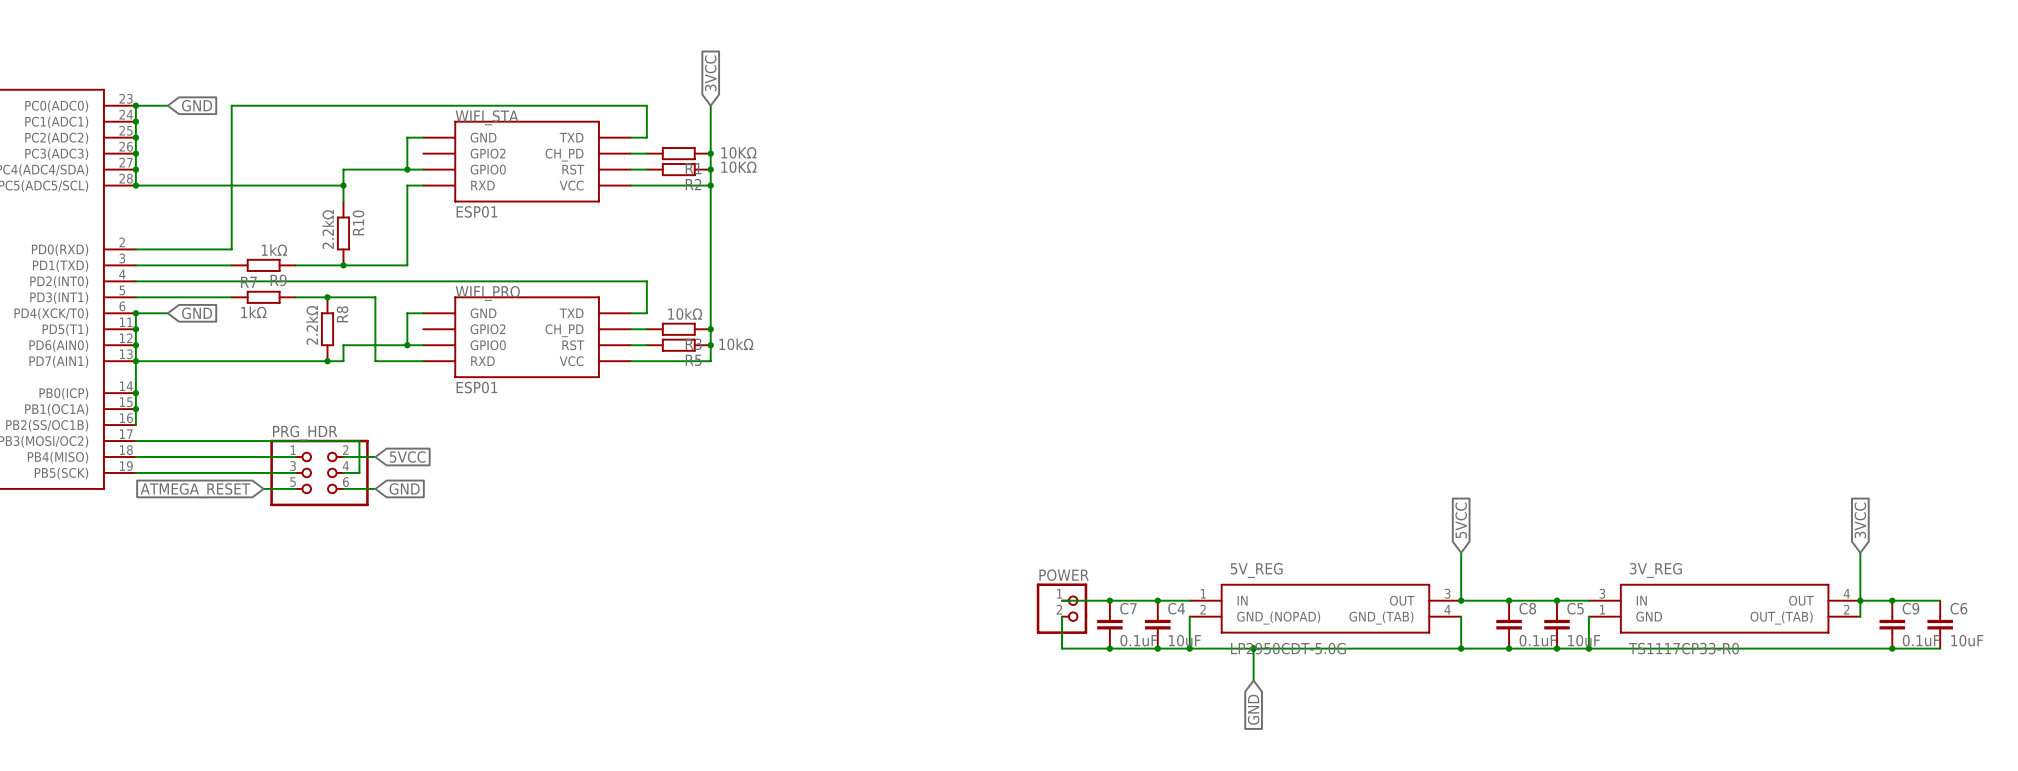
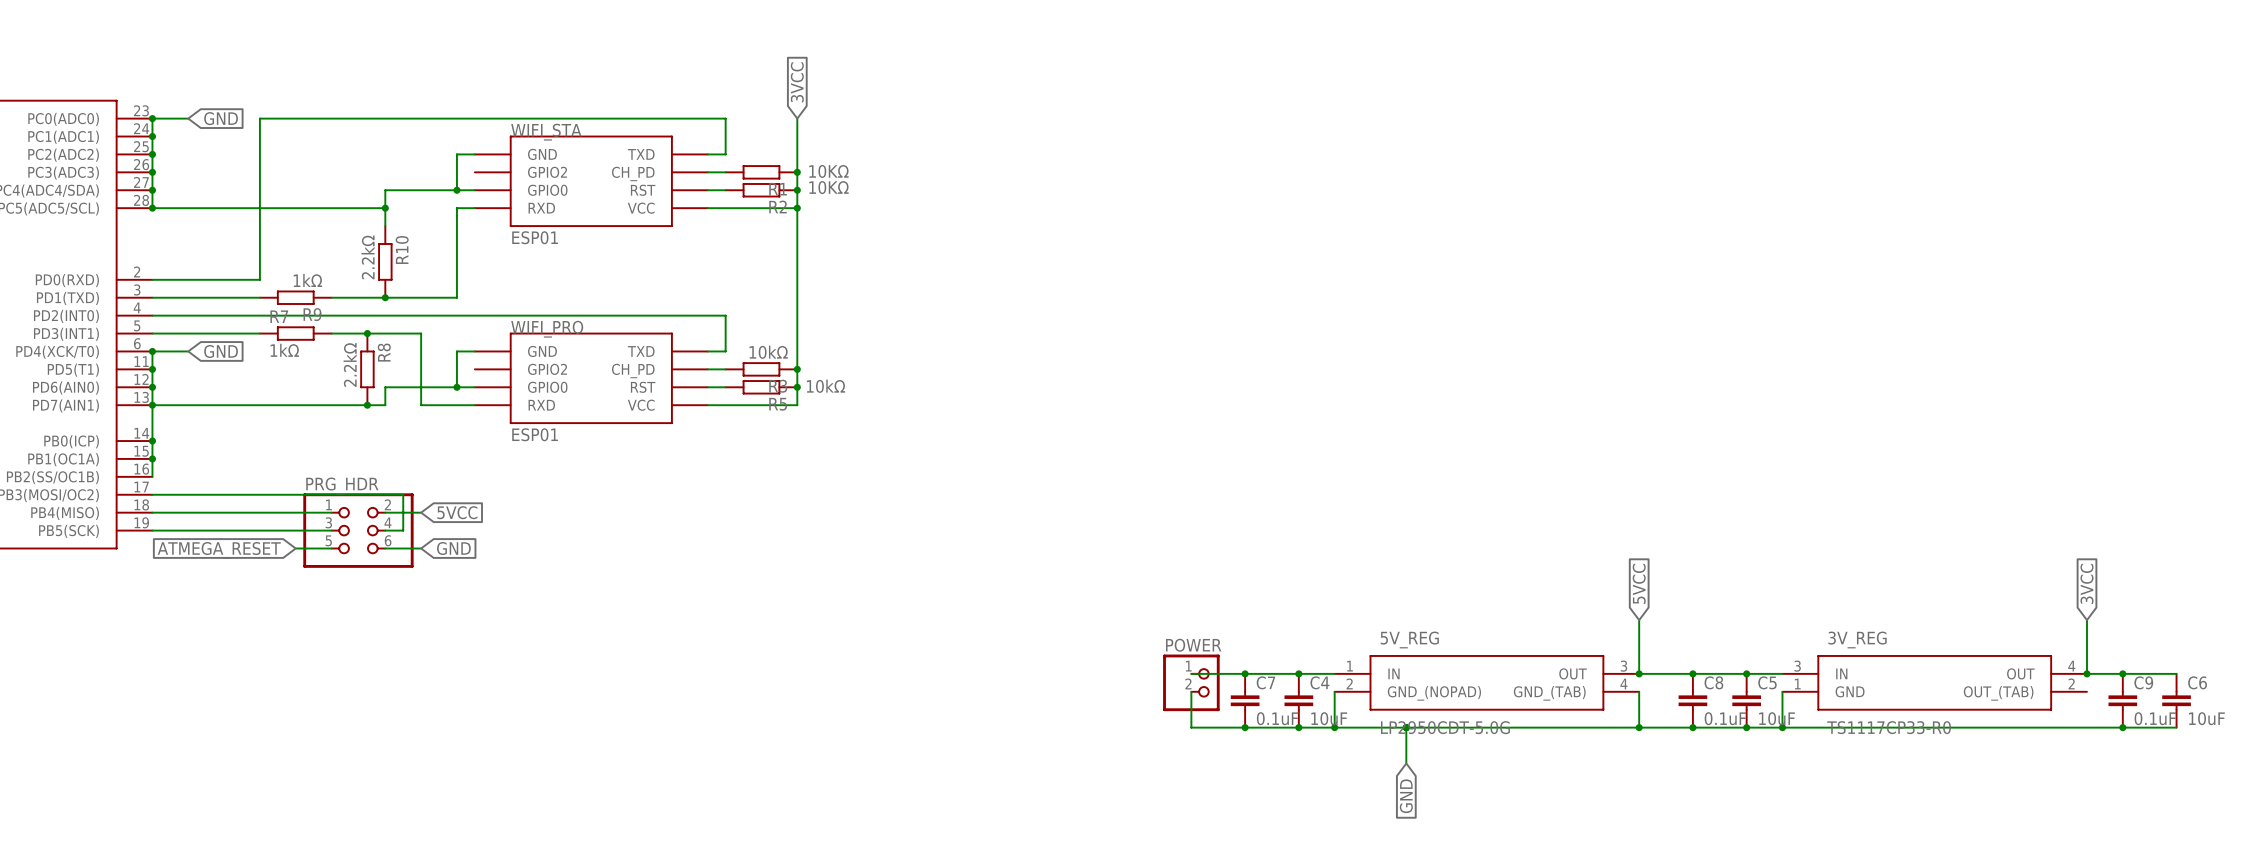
wire: (1860, 600) (1860, 616) -> none

